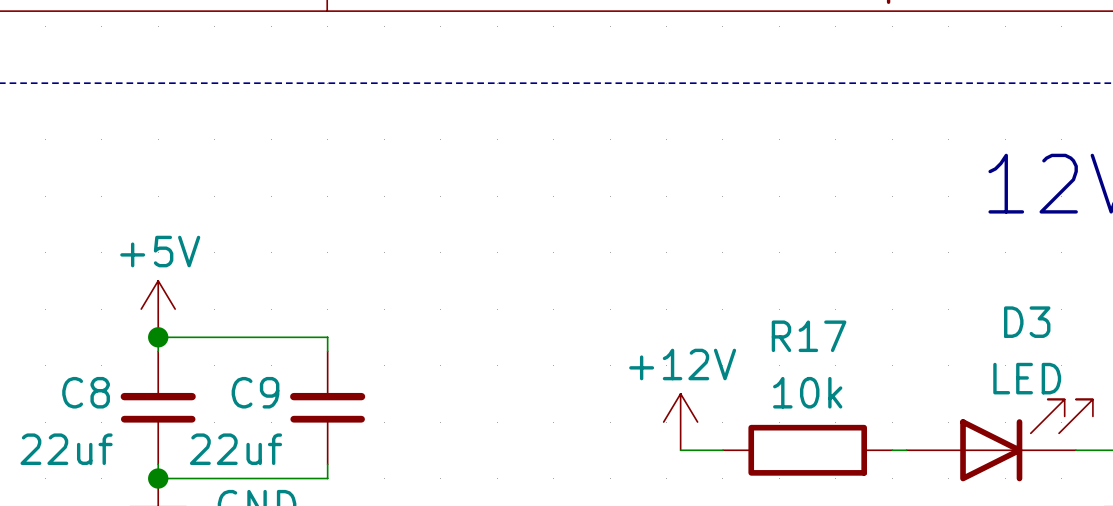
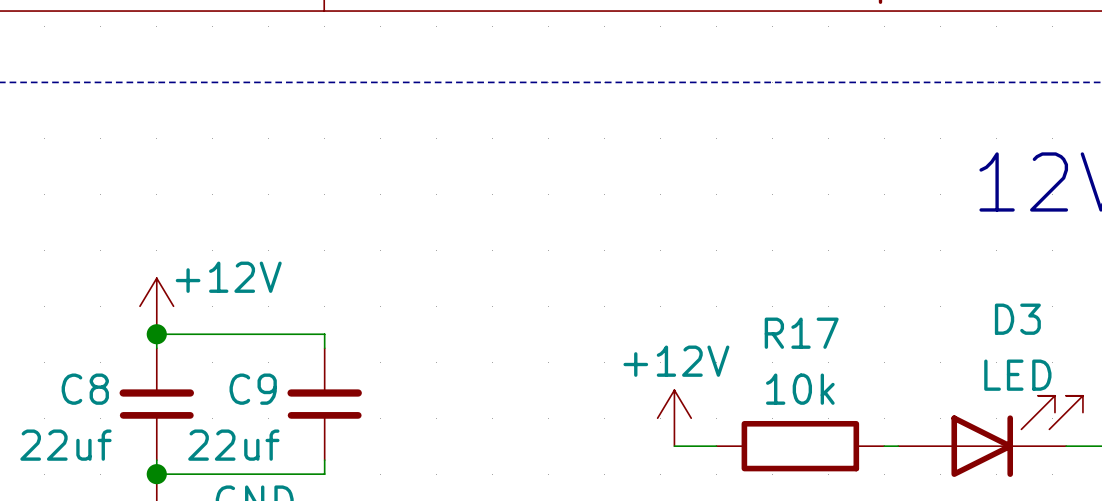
power symbol: +5V (158, 309) -> +12V (156, 306)

